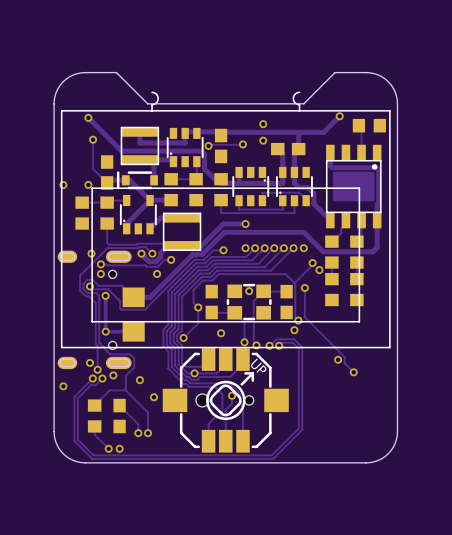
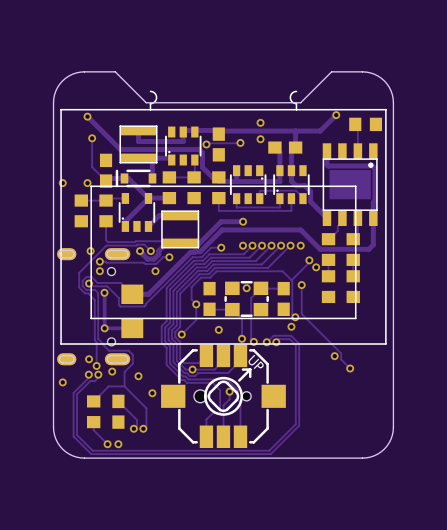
via: none -> (88, 374)
via: (92, 378) -> none
via: none -> (98, 374)
via: (102, 378) -> none
via: none -> (133, 428)
via: (138, 433) -> none
via: none -> (143, 428)
via: (147, 433) -> none

